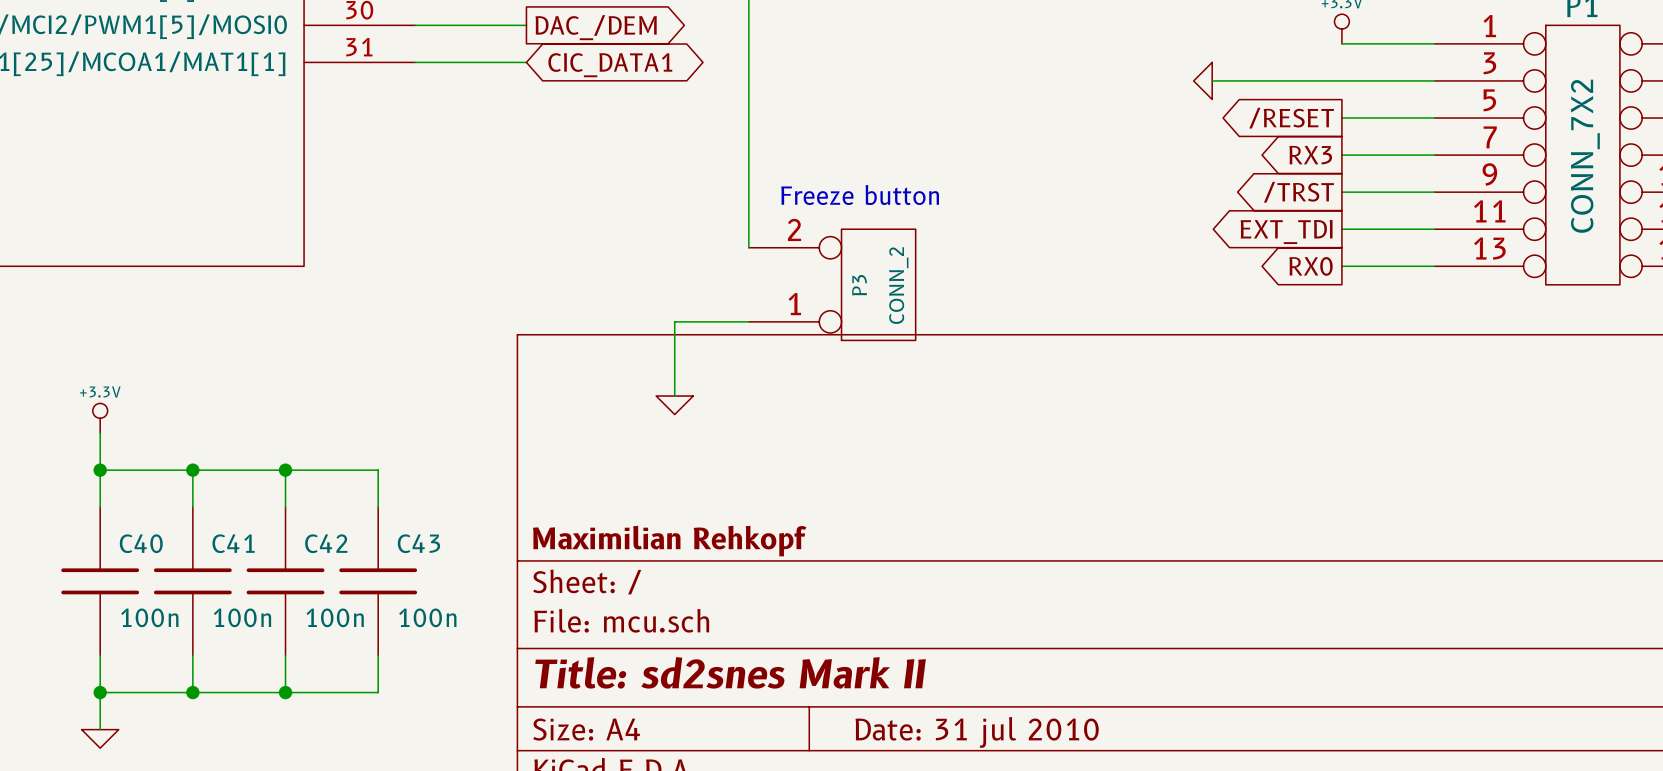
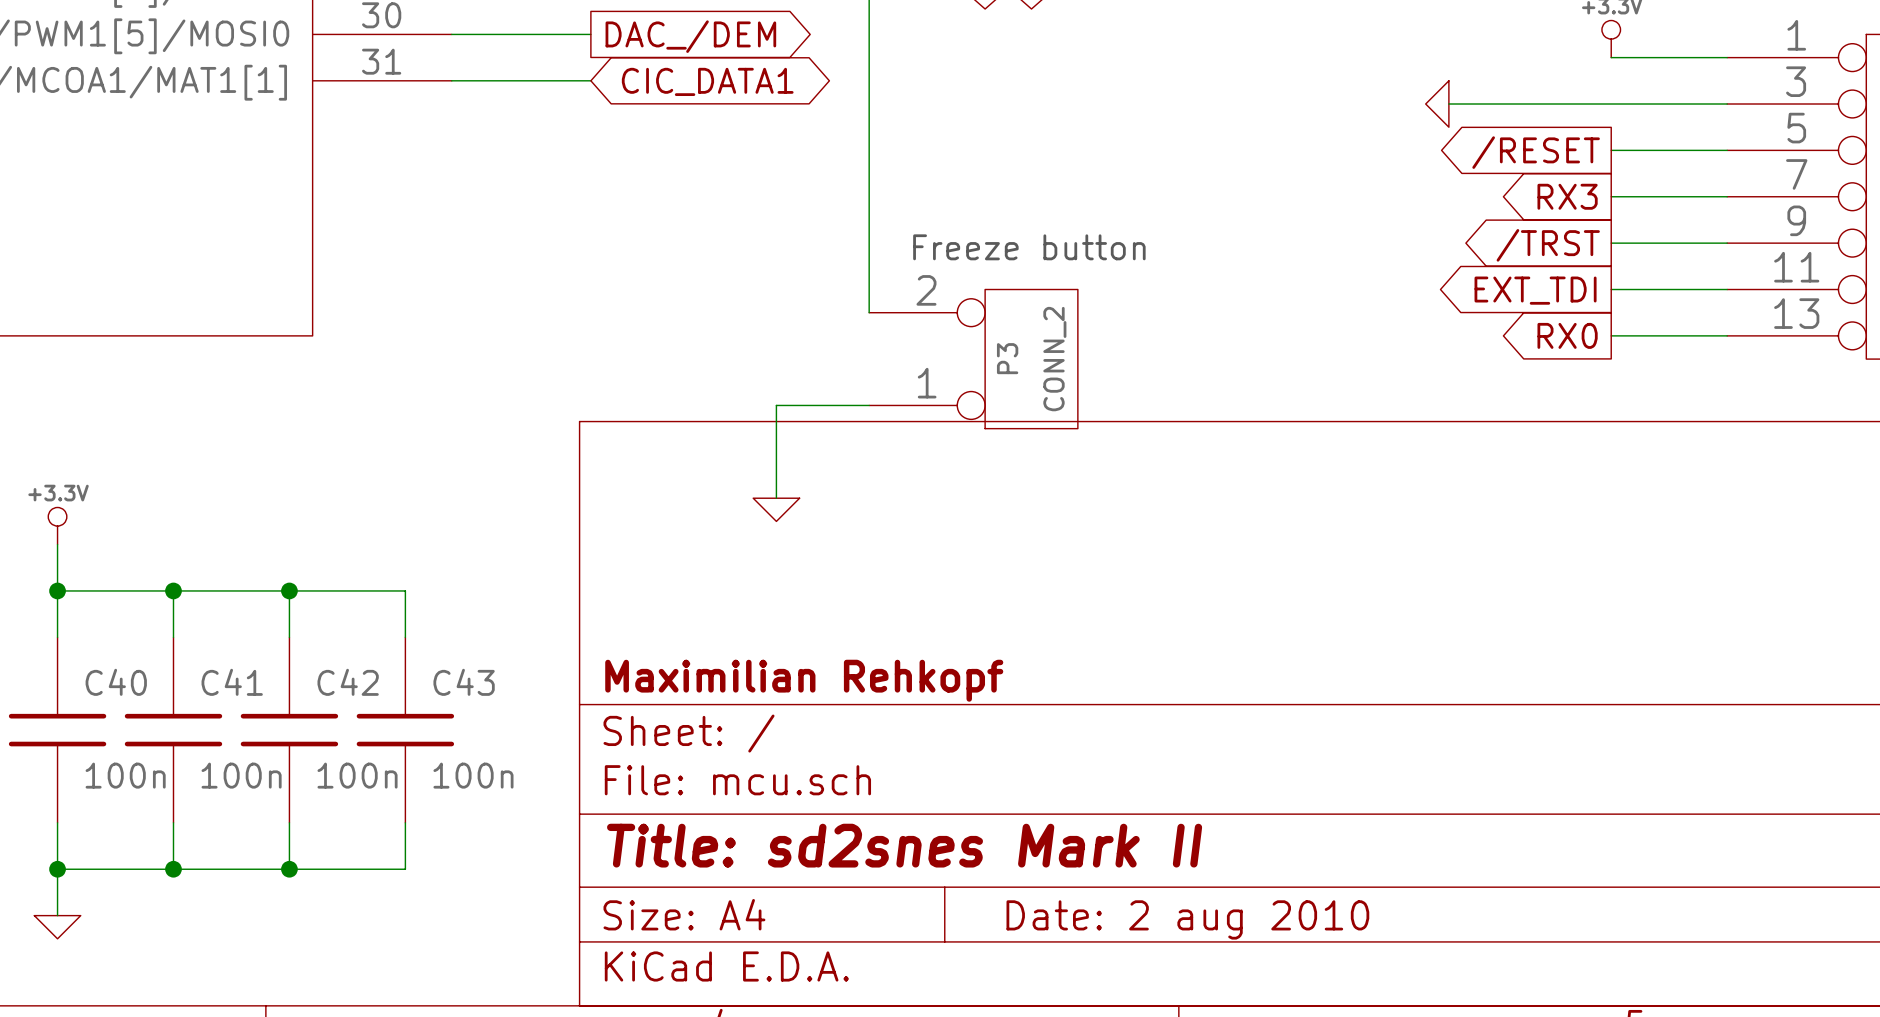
title block: Date: 31 jul 2010 (977, 732) -> Date: 2 aug 2010 (1187, 919)

